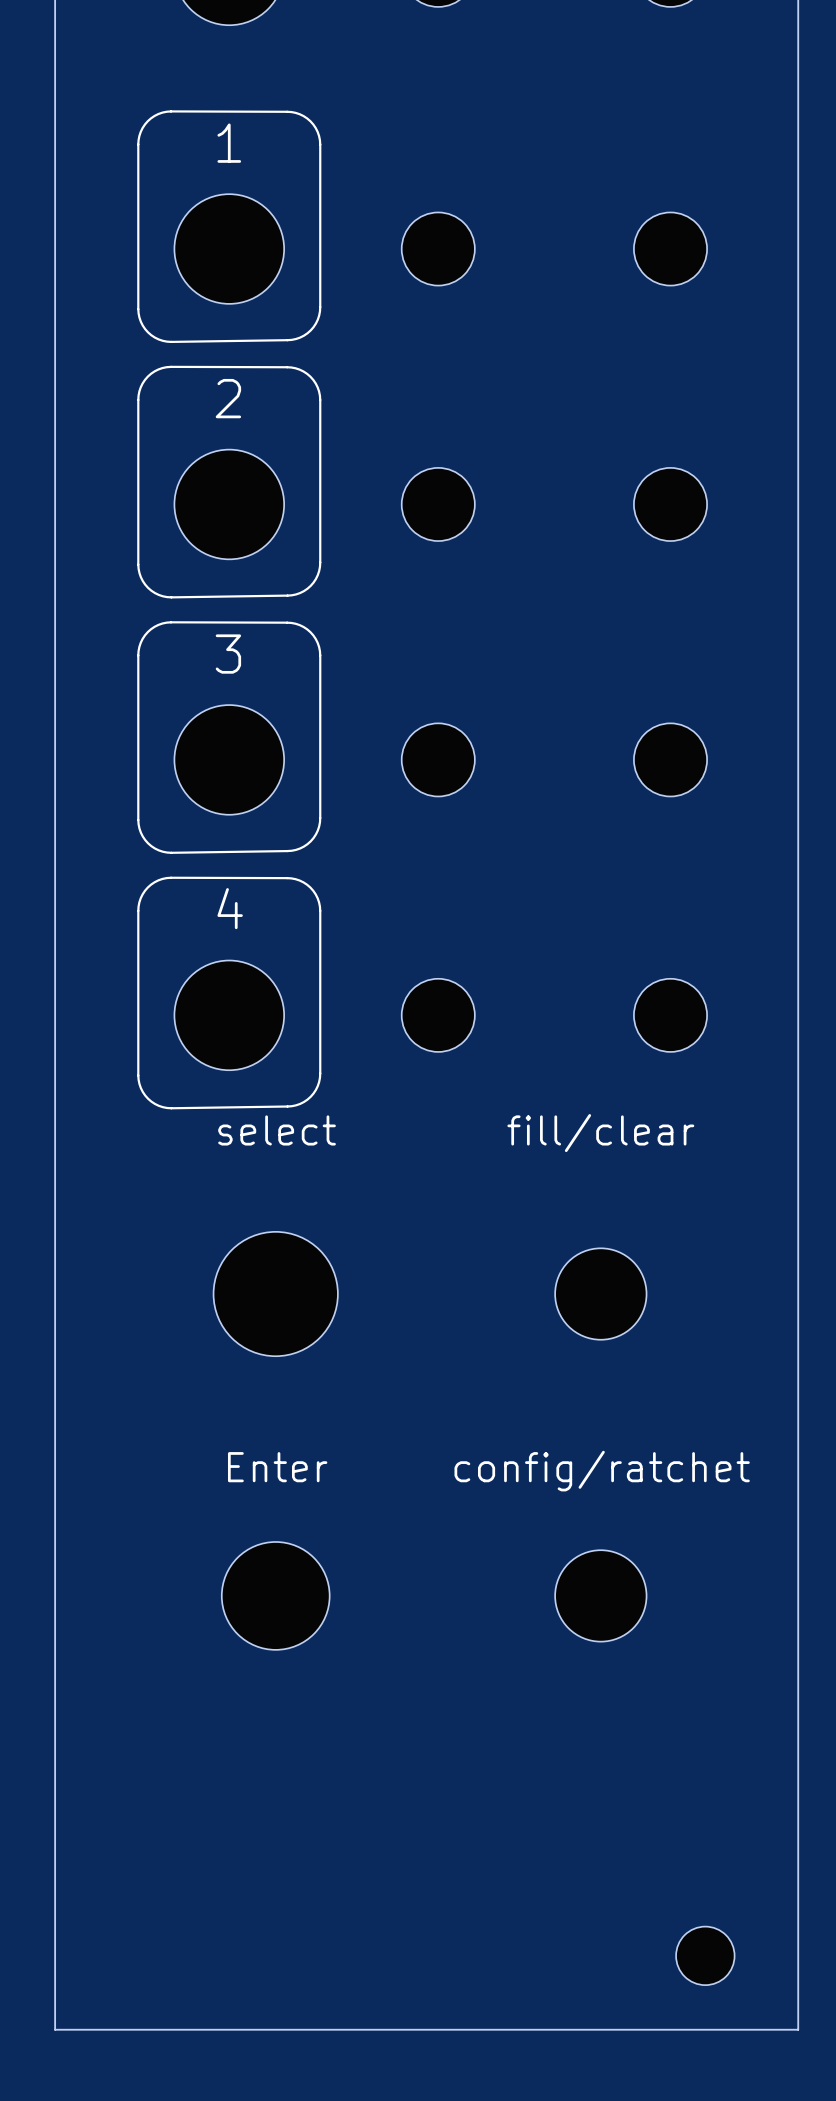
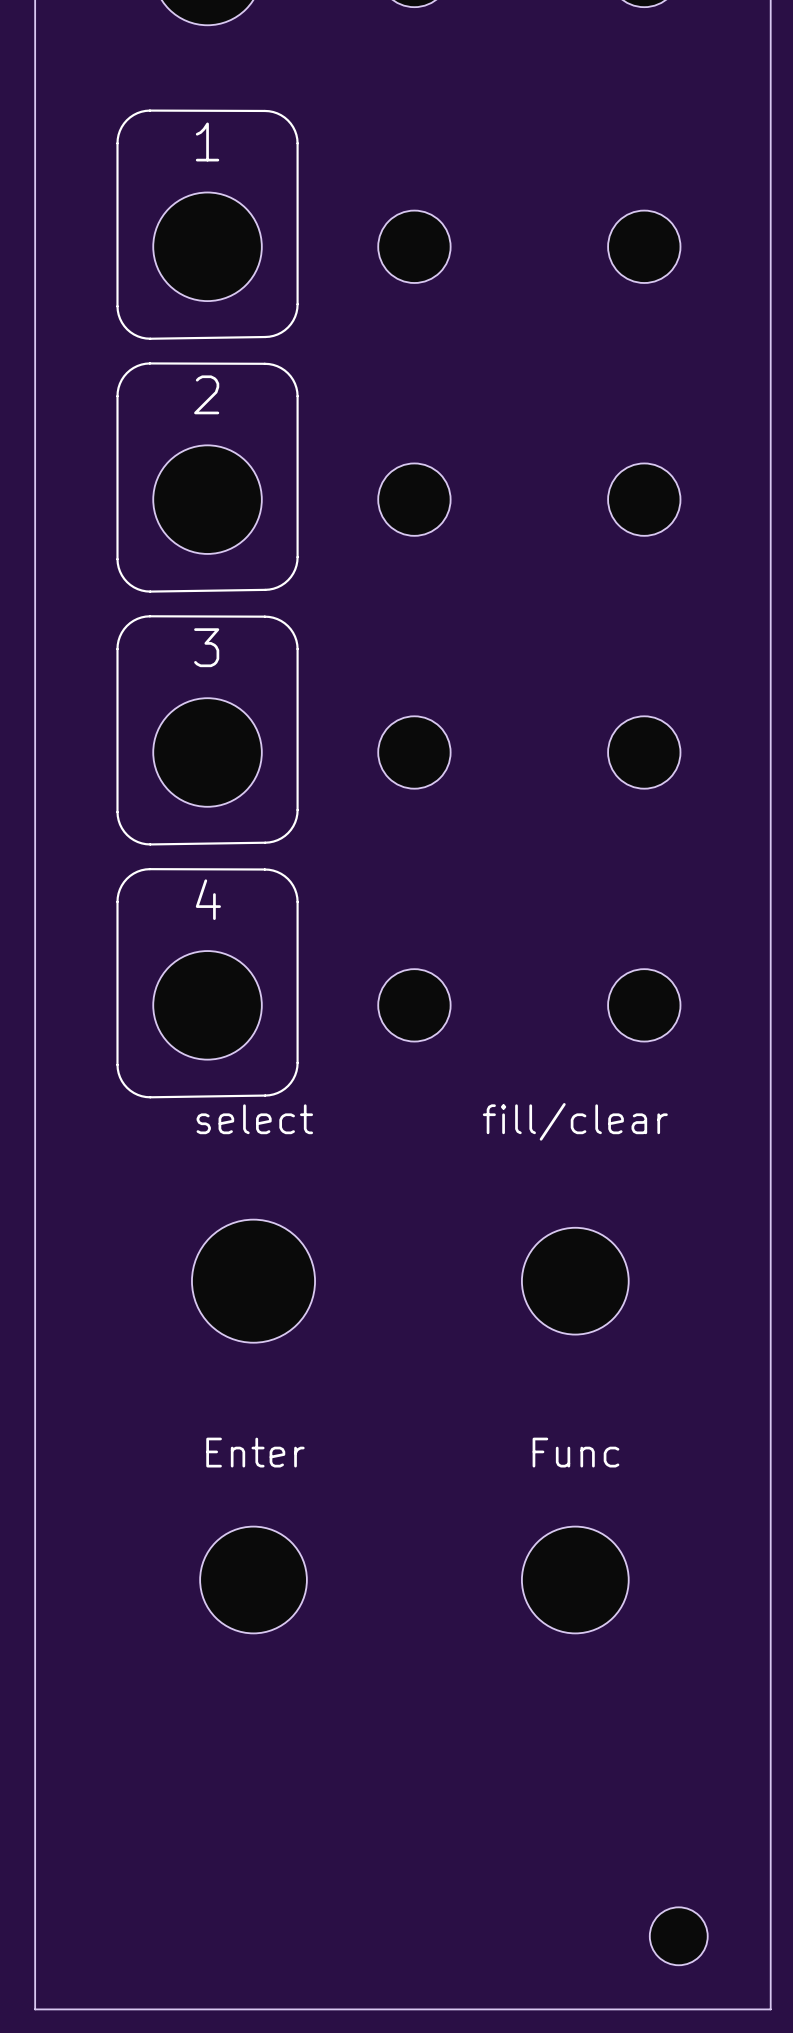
fill/clear footprint: [555, 1248, 647, 1340] -> [521, 1227, 629, 1335]
config/ratchet: (600, 1595) -> none
Func: none -> (575, 1580)

